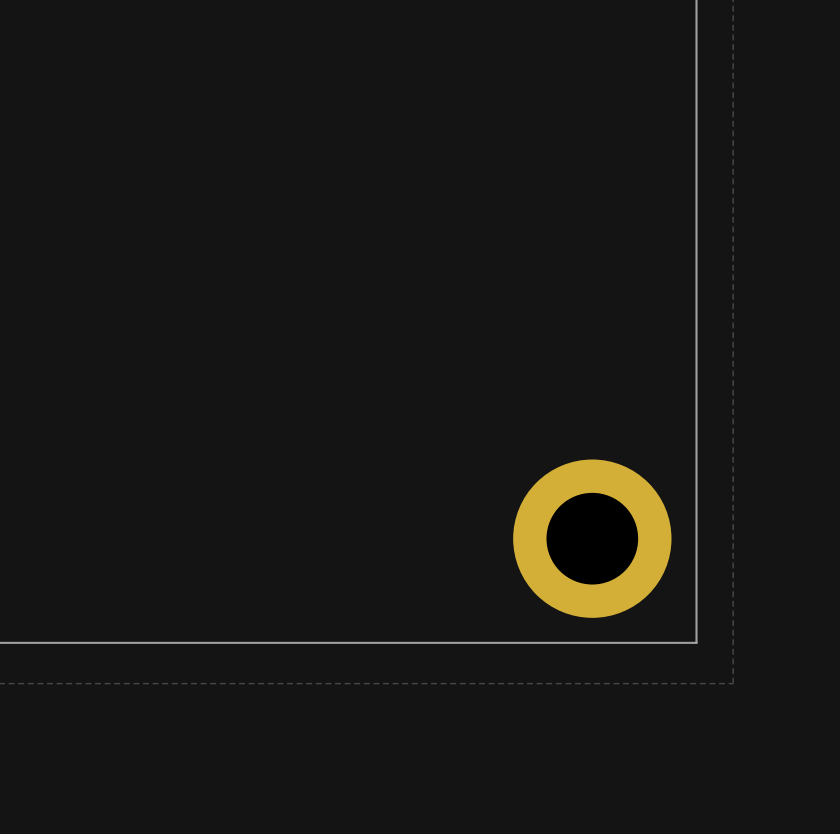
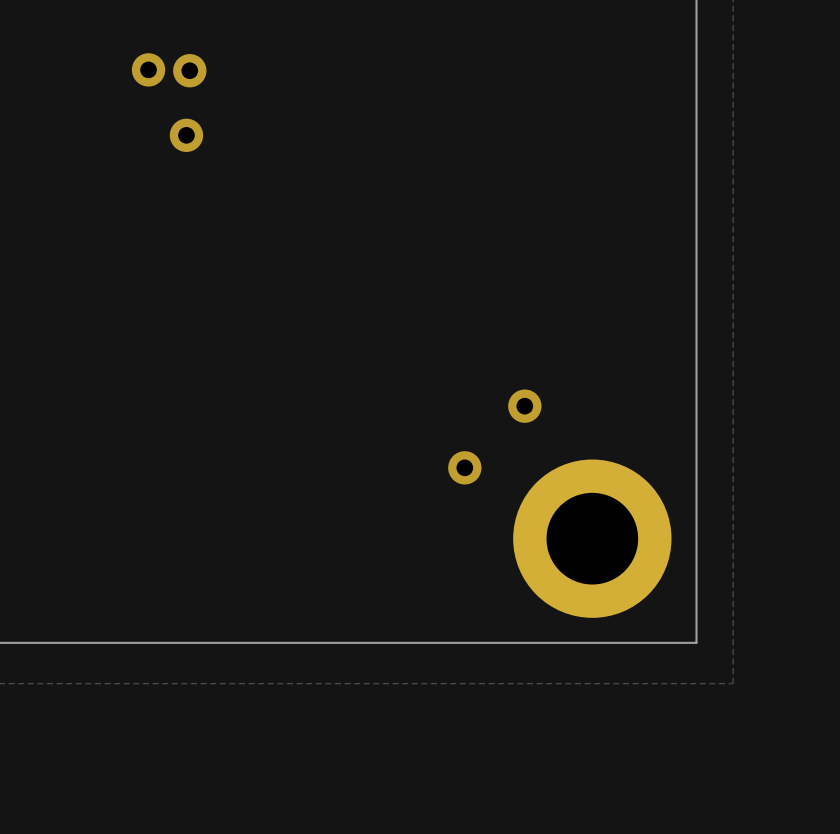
via: none -> (148, 69)
via: none -> (189, 70)
via: none -> (186, 135)
via: none -> (524, 406)
via: none -> (464, 467)

